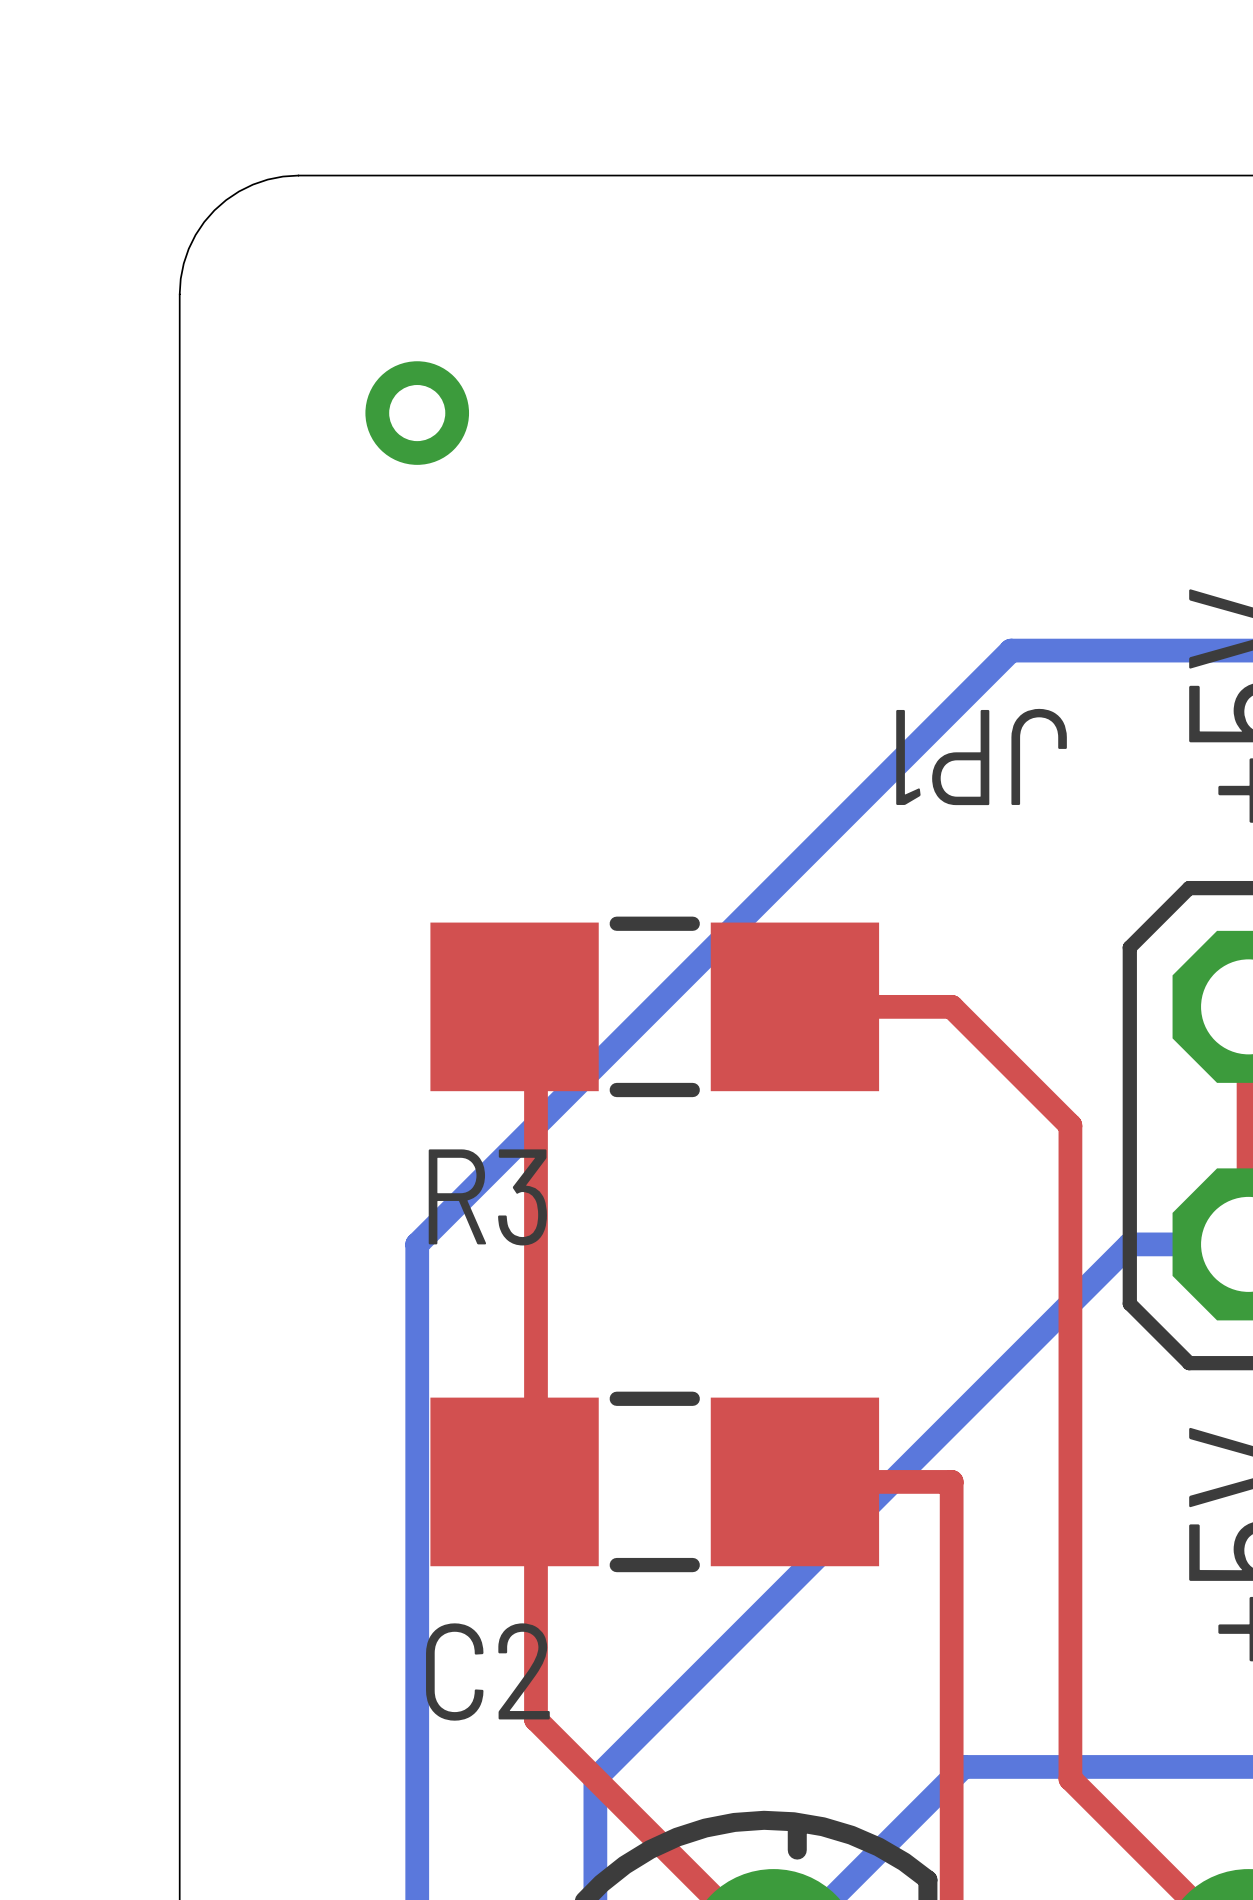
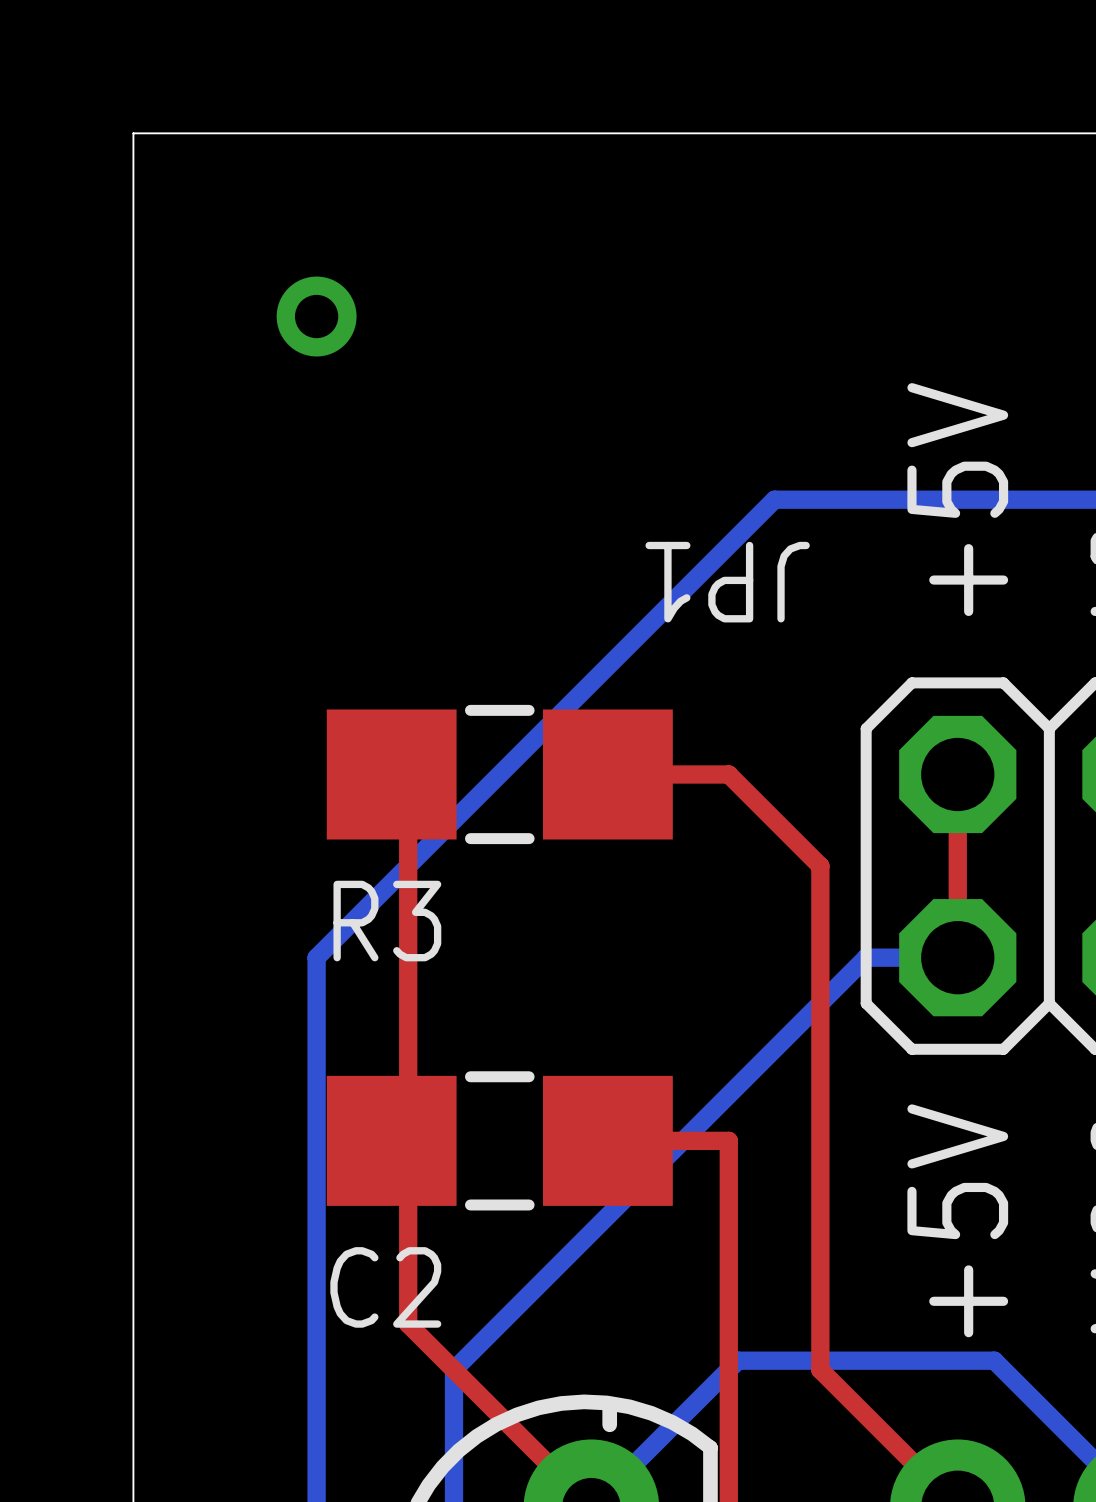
board edge: (298, 175) (267, 179) (253, 184) (239, 191) (214, 210) (195, 234) (188, 248) (183, 263) (179, 294) -> (225, 133) (133, 133) (133, 224)

